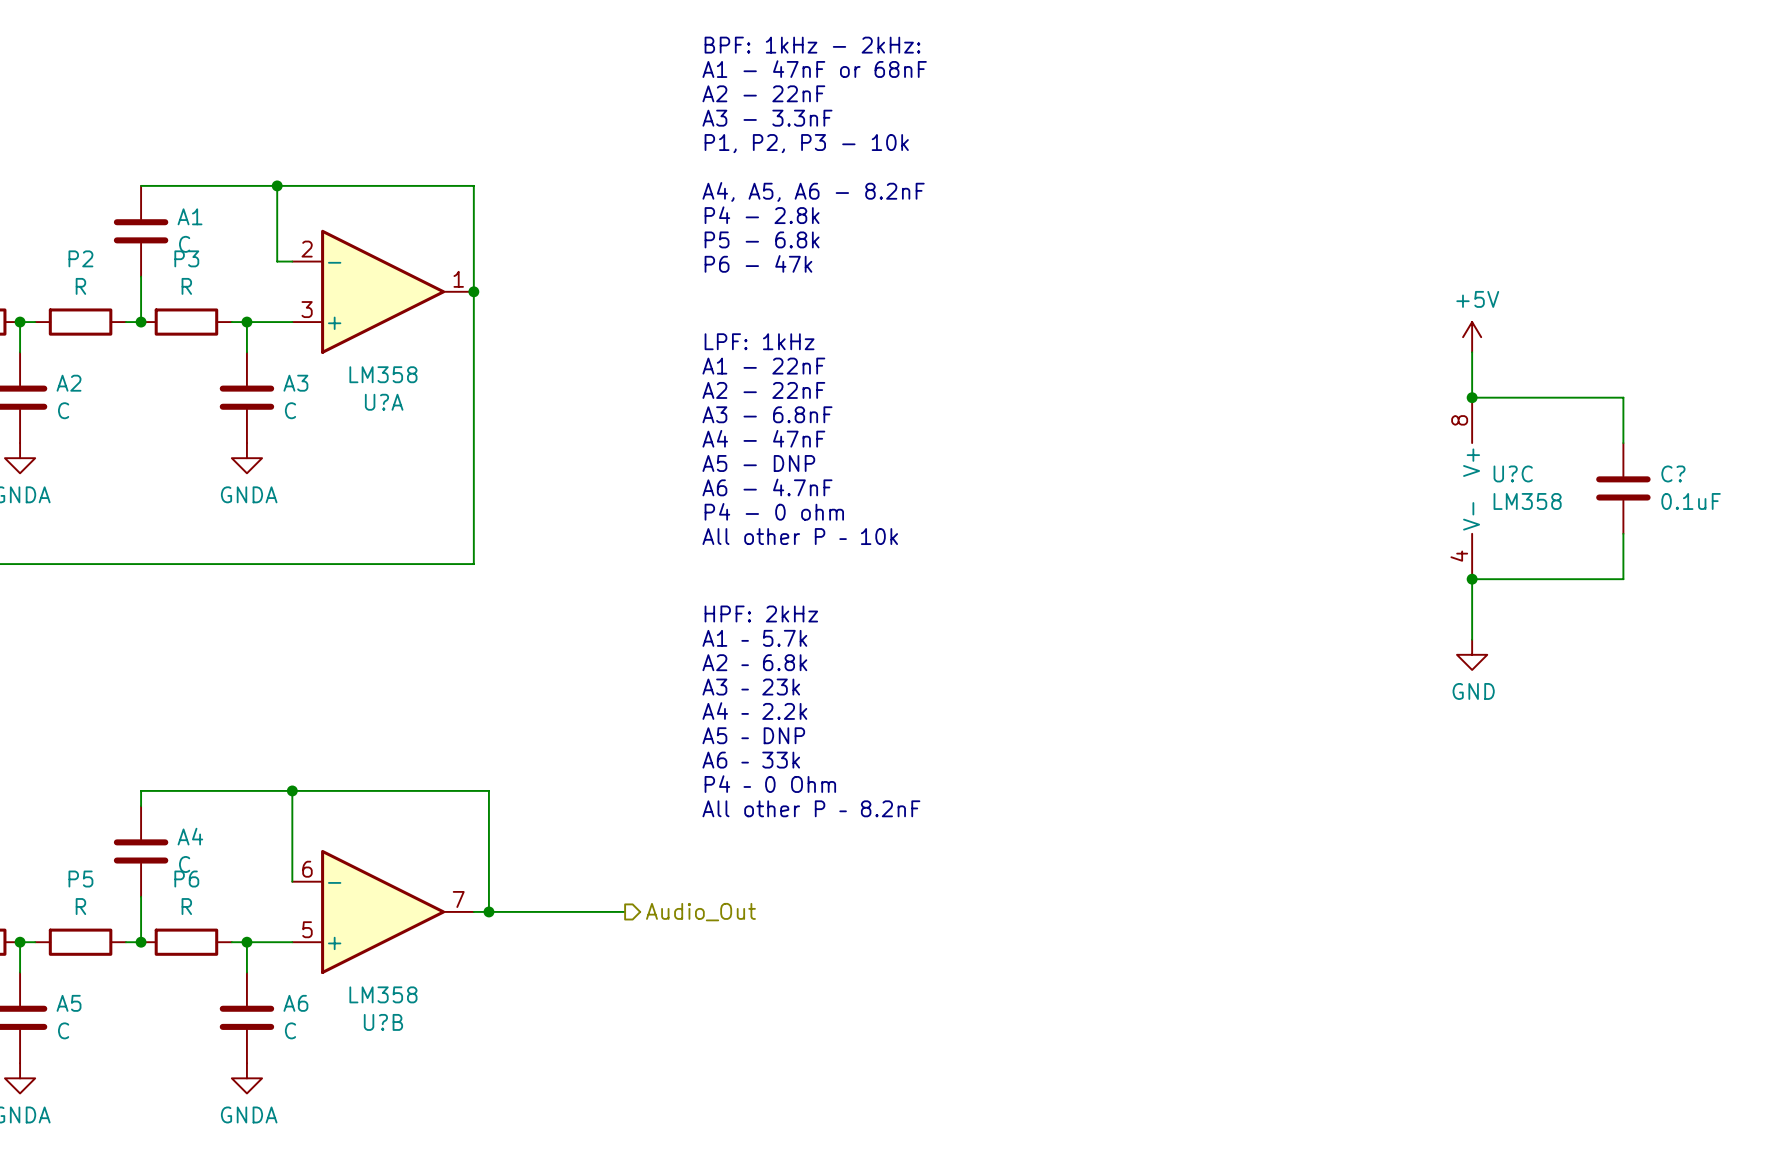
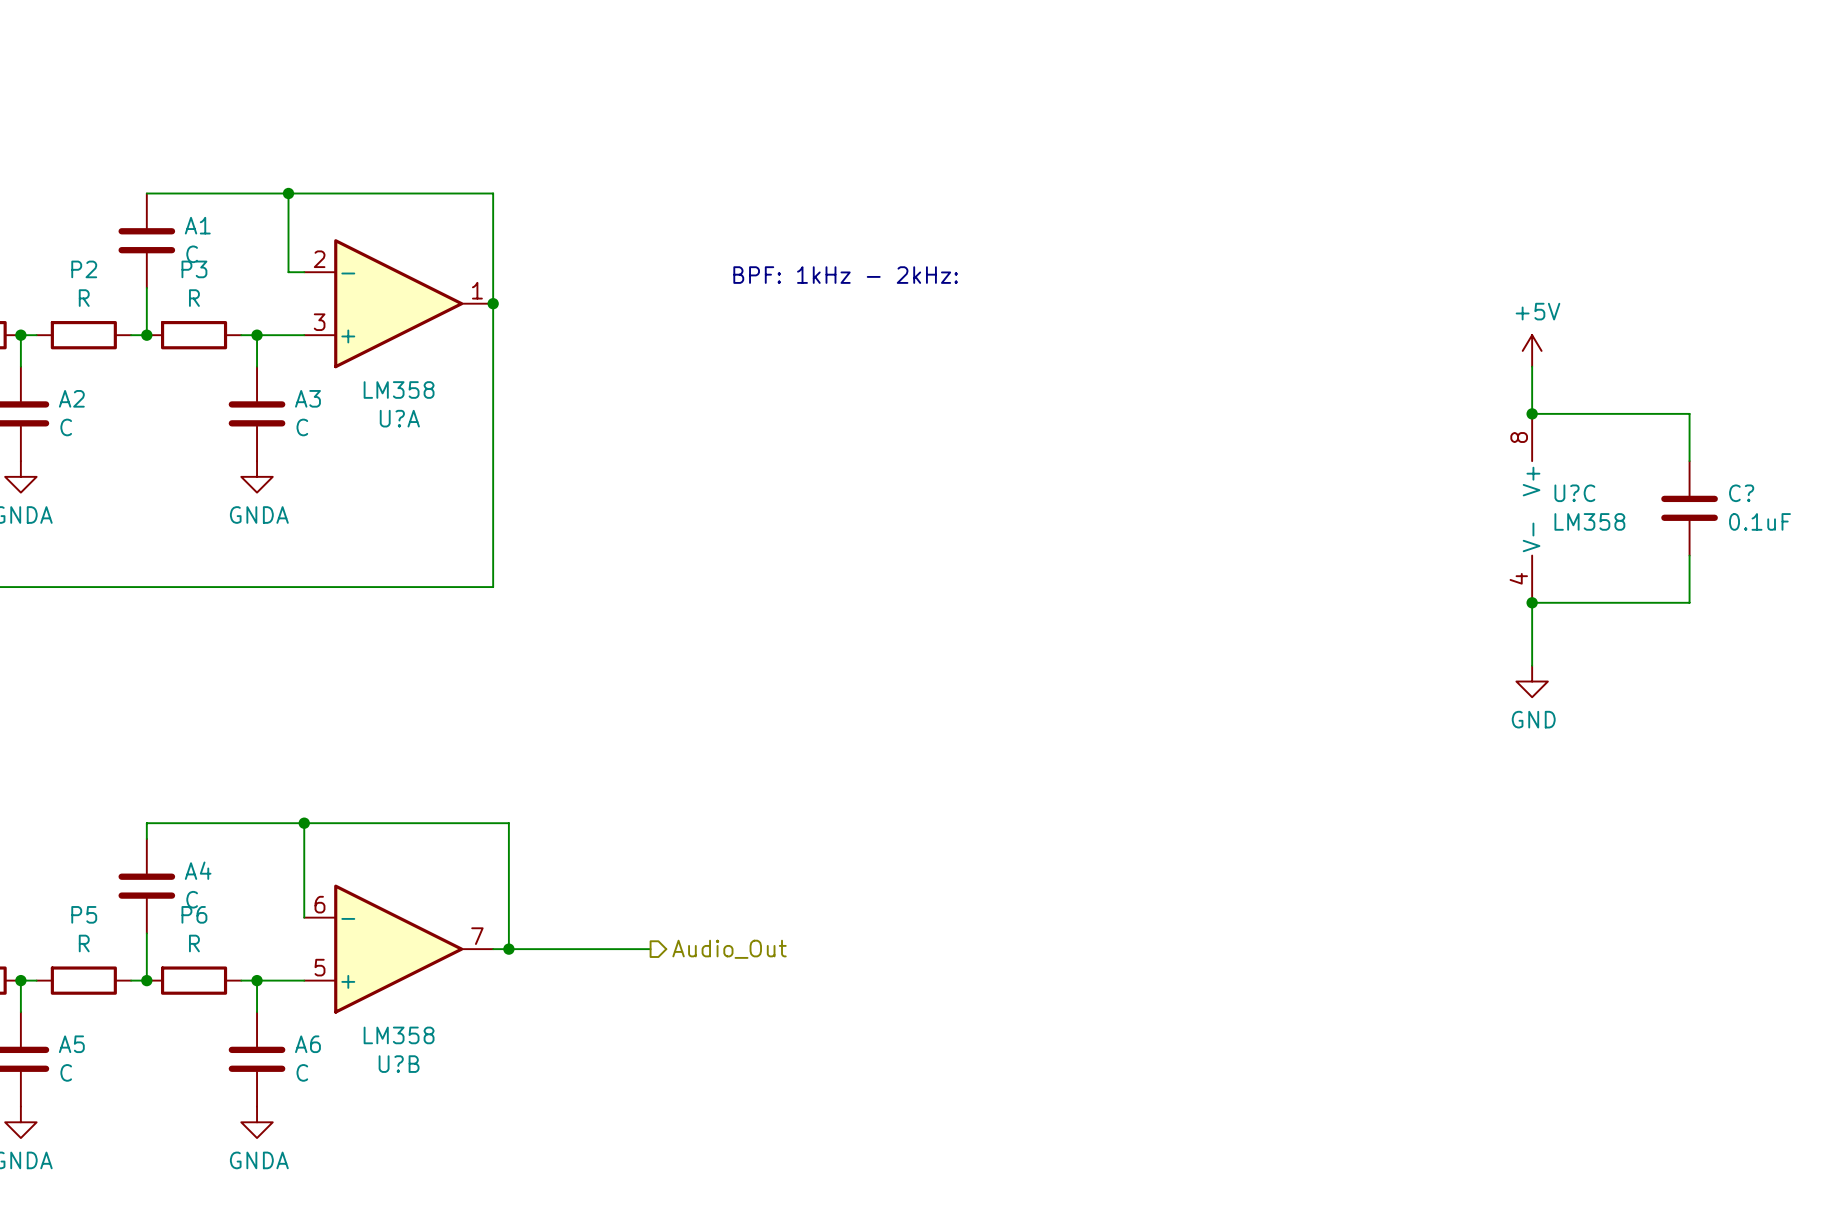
text: BPF: 1kHz - 2kHz: (812, 45) -> none
text: A1 - 47nF or 68nF (814, 69) -> none
text: A2 - 22nF (763, 93) -> none
text: A3 - 3.3nF (767, 118) -> none
text: P1, P2, P3 - 10k (806, 143) -> none
text: A4, A5, A6 - 8.2nF (813, 191) -> none
text: P4 - 2.8k (762, 215) -> none
text: P5 - 6.8k (762, 239) -> none
text: P6 - 47k (758, 263) -> BPF: 1kHz - 2kHz: (845, 275)
text: LPF: 1kHz (759, 341) -> none
text: A1 - 22nF (763, 366) -> none
text: A2 - 22nF (763, 390) -> none
text: A3 - 6.8nF (767, 414) -> none
text: A4 - 47nF (763, 438) -> none
text: A5 - DNP (758, 463) -> none
text: A6 - 4.7nF (767, 487) -> none
text: P4 - 0 ohm (774, 511) -> none
text: All other P – 10k (800, 536) -> none
text: HPF: 2kHz (761, 613) -> none
text: A1 – 5.7k (754, 638) -> none
text: A2 – 6.8k (754, 662) -> none
text: A3 – 23k (751, 687) -> none
text: A4 – 2.2k (754, 711) -> none
text: A5 – DNP (753, 735) -> none
text: A6 – 33k (751, 760) -> none
text: P4 – 0 Ohm (770, 784) -> none
text: All other P – 8.2nF (811, 808) -> none

